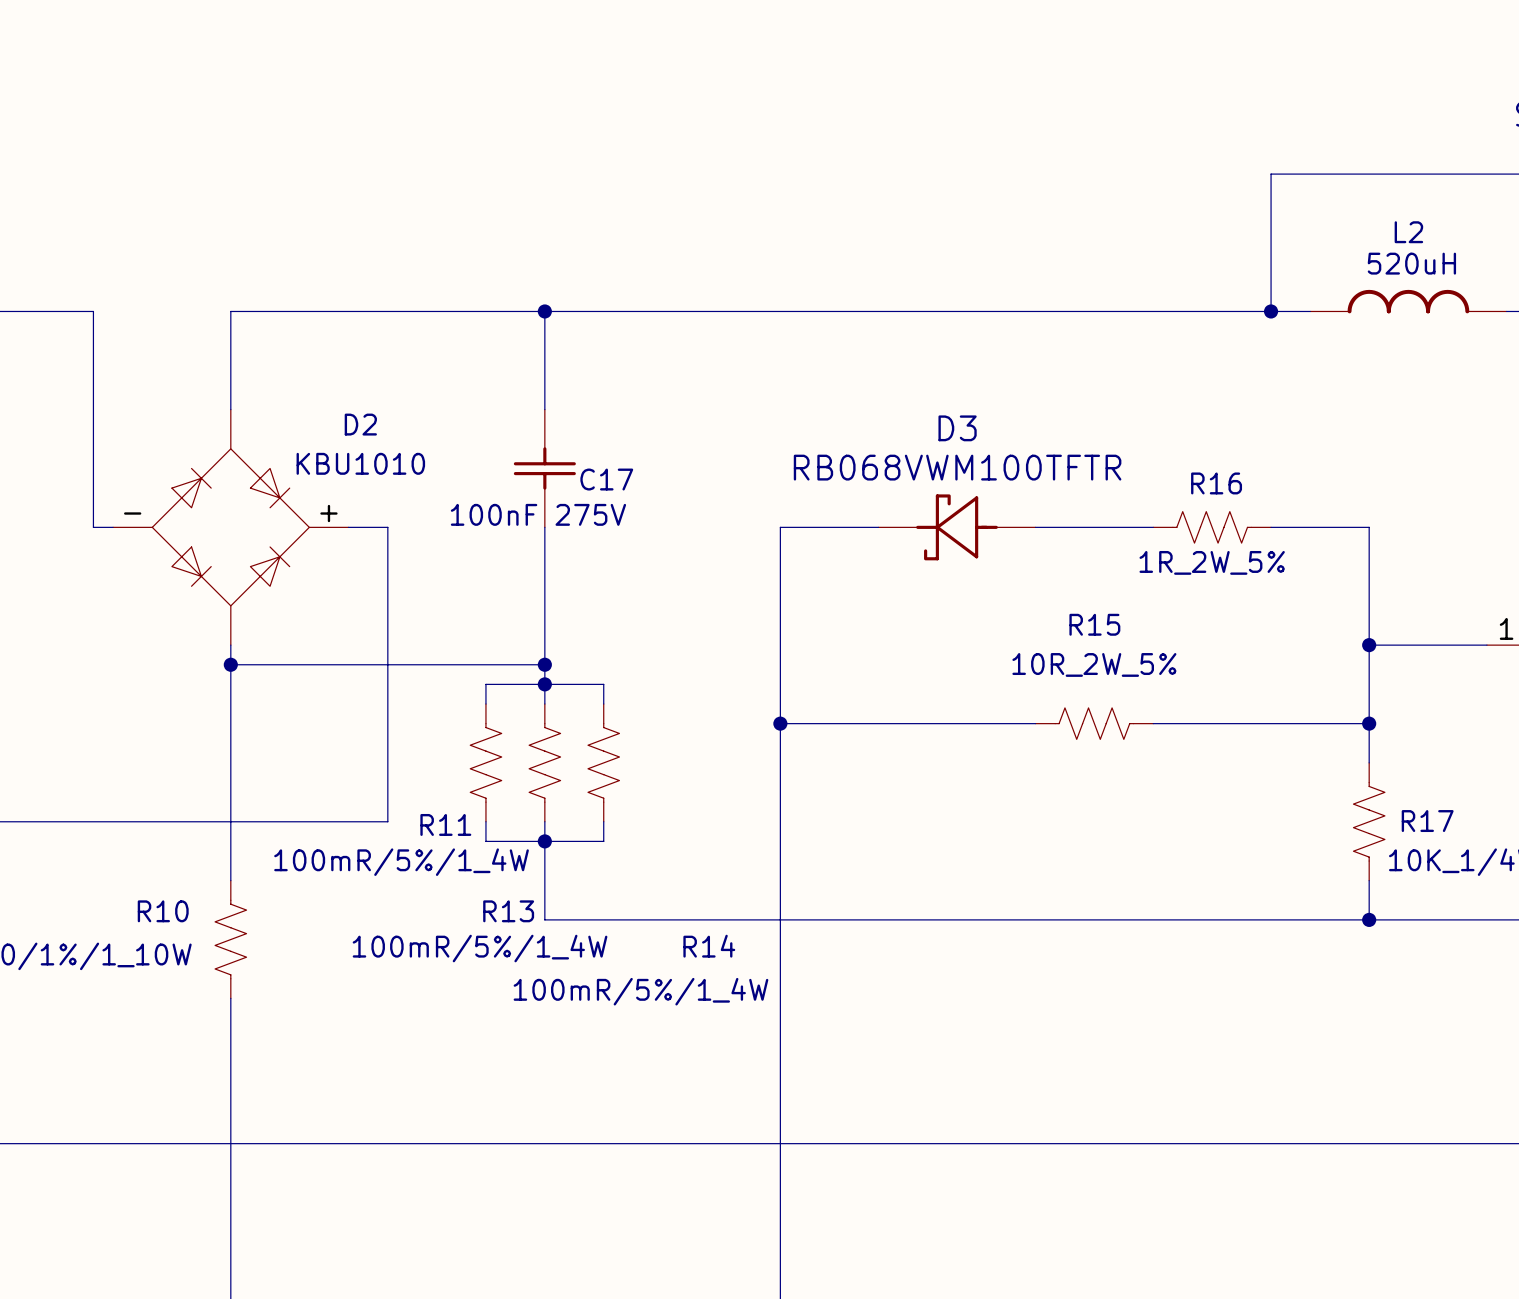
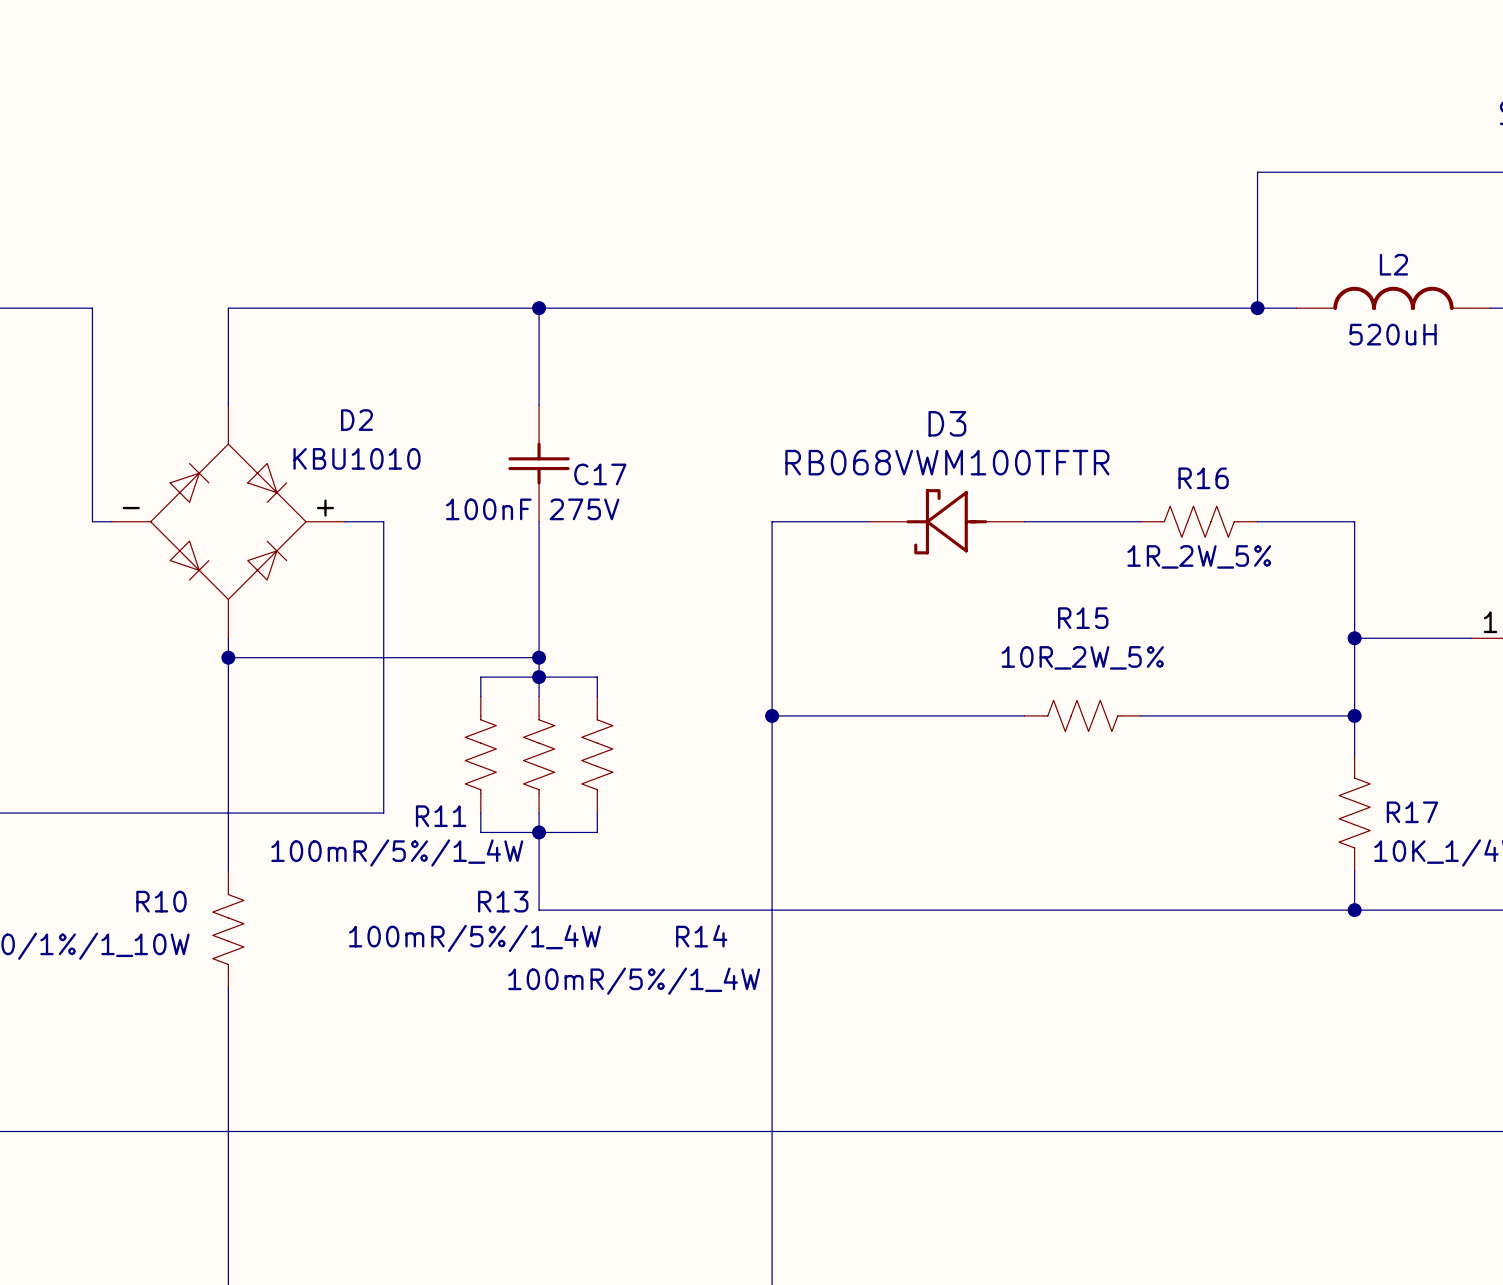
L2 name position: L2 (1408, 232) -> L2 (1393, 264)
L2 value position: 520uH (1411, 263) -> 520uH (1393, 334)

